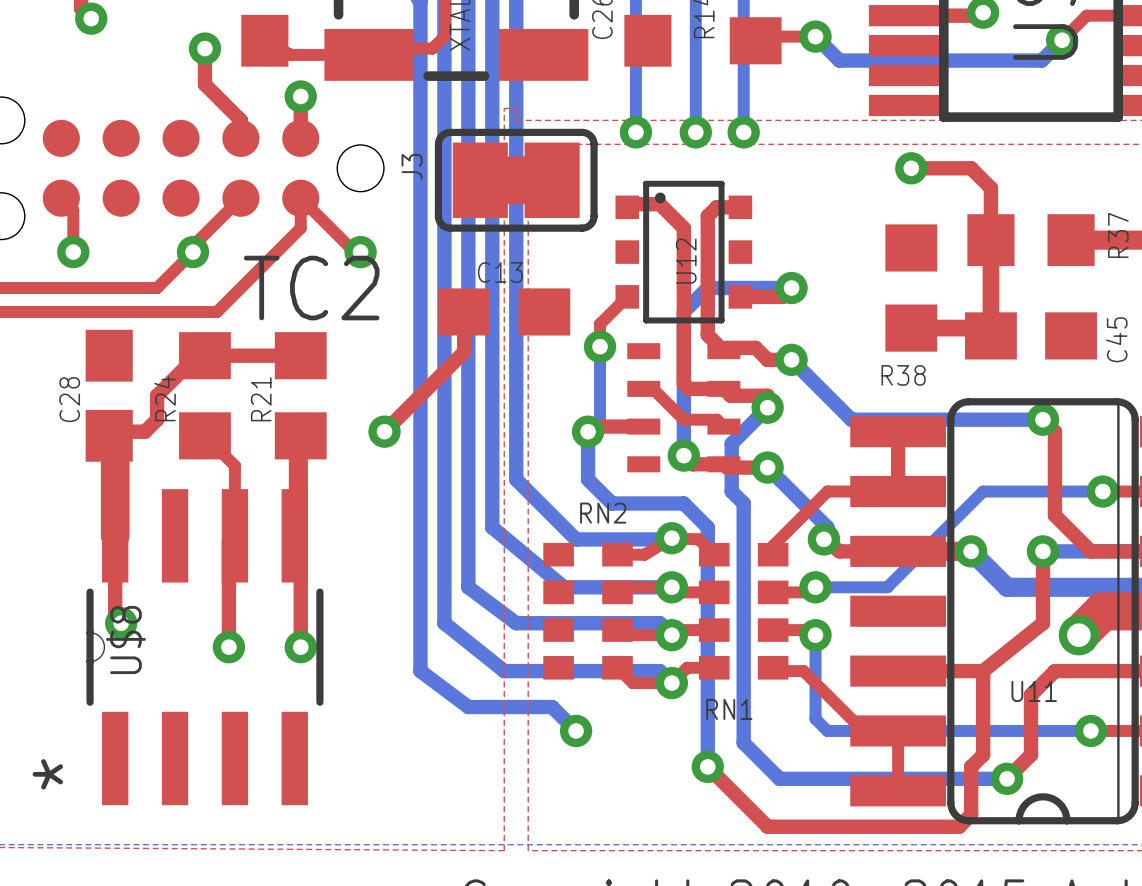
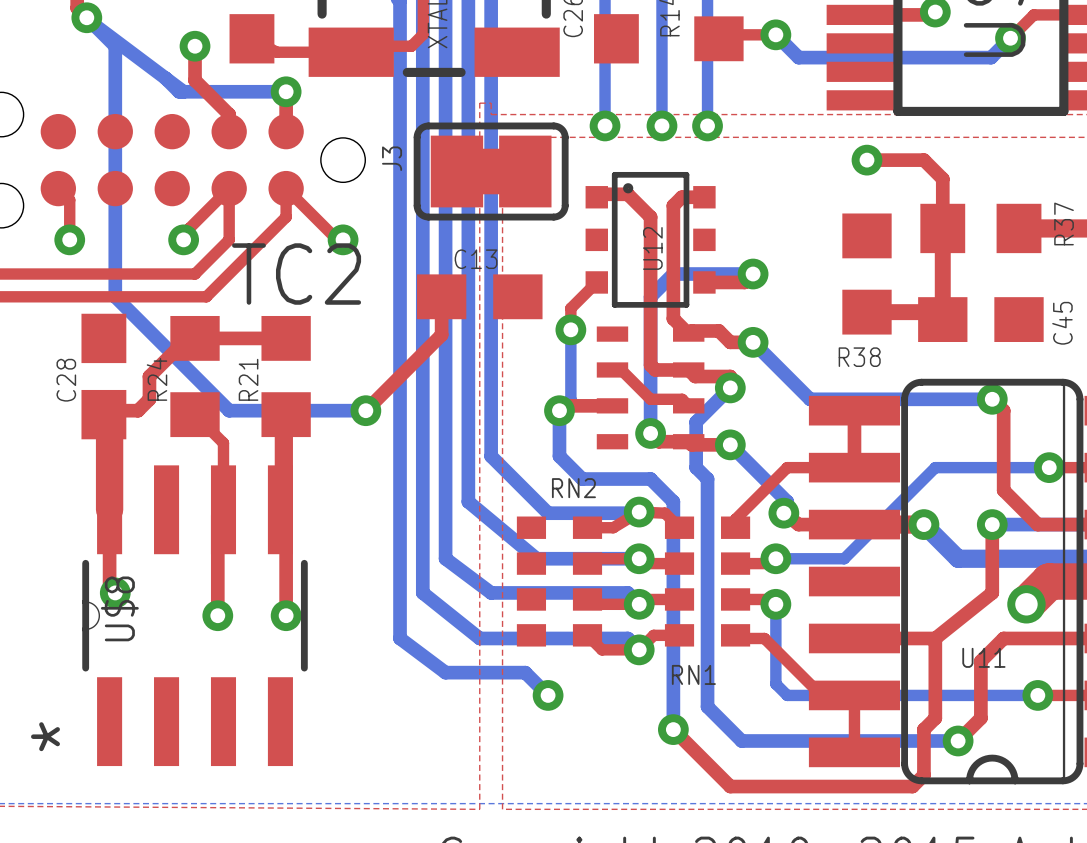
bottom track: none -> (165, 78) (179, 91) (286, 91)
bottom track: none -> (183, 91) (92, 23) (115, 46) (115, 296) (229, 410) (365, 410)
top track: (193, 252) (157, 288) -> (229, 188) (229, 239) (195, 274) (149, 274)

